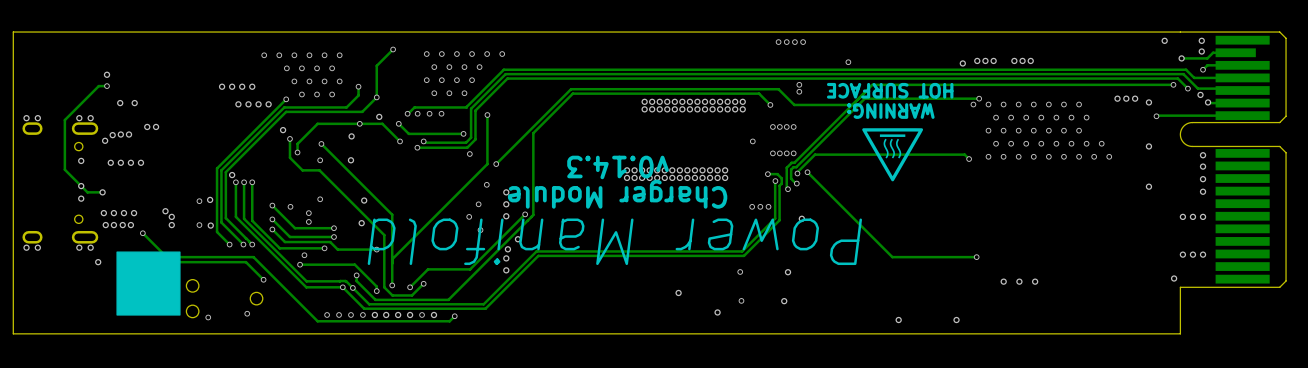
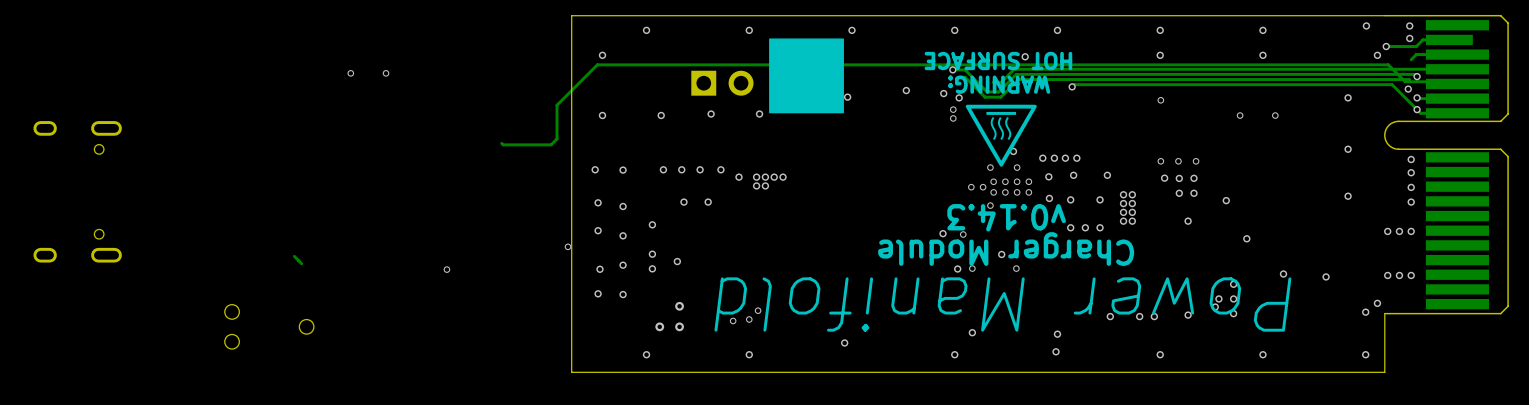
board edge: (483, 32) (13, 32) (13, 333) (1180, 333) -> (571, 15) (571, 372) (1384, 372) (1384, 367)
via: (778, 42) -> none
via: (786, 42) -> none
via: (794, 42) -> none
via: (803, 42) -> none
via: none -> (646, 30)
via: none -> (749, 30)
via: none -> (852, 30)
via: none -> (954, 30)
via: none -> (1057, 30)
via: none -> (1160, 30)
via: none -> (1262, 30)
track: (393, 49) (376, 65) (376, 97) (362, 111) (286, 111) (225, 172) (225, 218) (245, 238) -> none
via: (393, 49) -> none
drawing: none -> [769, 38, 844, 114]
via: (426, 54) -> none
via: (441, 54) -> none
via: (456, 54) -> none
via: (472, 54) -> none
via: (487, 54) -> none
via: (502, 54) -> none
via: (264, 55) -> none
via: (279, 55) -> none
via: (294, 55) -> none
via: (309, 55) -> none
via: (324, 55) -> none
via: (339, 55) -> none
via: (977, 60) -> none
via: (985, 60) -> none
via: (993, 60) -> none
via: (1014, 60) -> none
via: (1022, 60) -> none
via: (1030, 60) -> none
via: (848, 62) -> none
via: (962, 63) -> none
via: none -> (602, 55)
via: none -> (1160, 55)
via: none -> (1262, 55)
via: none -> (1377, 55)
via: (434, 67) -> none
via: (449, 67) -> none
via: (464, 67) -> none
via: (479, 67) -> none
via: none -> (1025, 56)
via: (286, 68) -> none
via: (301, 68) -> none
via: (317, 68) -> none
via: (332, 68) -> none
via: (1203, 69) -> none
via: (107, 74) -> none
track: (1194, 77) (1186, 69) (503, 69) (466, 107) (414, 107) (407, 113) -> (1400, 69) (1014, 69) (1001, 82) (993, 82)
track: none -> (952, 69) (965, 69) (987, 92) (998, 92) (1016, 74) (1414, 74) (1417, 76)
via: none -> (952, 69)
via: (426, 80) -> none
via: (441, 80) -> none
via: (456, 80) -> none
via: (472, 80) -> none
via: (309, 81) -> none
via: (339, 81) -> none
via: (799, 84) -> none
track: none -> (962, 77) (965, 77) (985, 97) (1000, 97) (1018, 79) (1409, 79)
track: (1173, 84) (872, 84) (794, 162) (786, 167) (788, 189) -> none
via: (1173, 84) -> none
via: none -> (1417, 76)
track: (107, 86) (98, 86) (64, 120) (64, 169) (87, 192) (102, 192) -> none
via: (107, 86) -> none
via: (222, 86) -> none
via: (232, 86) -> none
via: (242, 86) -> none
via: (252, 86) -> none
track: (358, 86) (358, 95) (346, 107) (284, 107) (221, 170) (221, 222) (243, 244) -> none
via: (358, 86) -> none
track: (1187, 88) (1177, 78) (507, 78) (475, 110) (475, 139) (467, 147) (417, 147) -> none
via: (1187, 88) -> none
part: none -> (722, 83)
text position: HOT SURFACE (890, 90) -> HOT SURFACE (998, 61)
via: (799, 91) -> none
via: (434, 93) -> none
via: (449, 93) -> none
via: (464, 93) -> none
via: none -> (1072, 86)
via: (301, 94) -> none
via: (317, 94) -> none
via: (332, 94) -> none
via: none -> (906, 90)
via: (376, 97) -> none
via: none -> (943, 93)
track: (979, 98) (864, 98) (796, 167) (791, 169) (791, 178) (796, 183) -> none
via: (979, 98) -> none
via: (1117, 98) -> none
via: (1126, 98) -> none
via: (1135, 98) -> none
track: (286, 99) (217, 168) (217, 231) (229, 244) -> none
via: (286, 99) -> none
via: (644, 101) -> none
via: (652, 101) -> none
via: (659, 101) -> none
via: (667, 101) -> none
via: (674, 101) -> none
via: (682, 101) -> none
via: (689, 101) -> none
via: (697, 101) -> none
via: (705, 101) -> none
via: (712, 101) -> none
via: (727, 101) -> none
via: (735, 101) -> none
via: (742, 101) -> none
via: none -> (959, 97)
via: (120, 103) -> none
via: (134, 103) -> none
via: (238, 104) -> none
via: (248, 104) -> none
via: (258, 104) -> none
via: (268, 104) -> none
track: (770, 104) (759, 93) (572, 93) (533, 133) (533, 215) (531, 216) -> none
via: (770, 104) -> none
track: (852, 104) (794, 104) (778, 89) (571, 89) (496, 164) -> none
via: (973, 104) -> none
via: (1003, 104) -> none
via: (1018, 104) -> none
via: (1033, 104) -> none
via: (1048, 104) -> none
via: (1063, 104) -> none
via: (1079, 104) -> none
via: (644, 109) -> none
via: (652, 109) -> none
via: (659, 109) -> none
via: (667, 109) -> none
via: (674, 109) -> none
via: (689, 109) -> none
via: (697, 109) -> none
via: (705, 109) -> none
via: (712, 109) -> none
via: (720, 109) -> none
via: (727, 109) -> none
via: (735, 109) -> none
via: (742, 109) -> none
text position: WARNING: (890, 111) -> WARNING: (999, 84)
via: none -> (953, 109)
via: none -> (1417, 109)
via: (407, 113) -> none
via: (417, 113) -> none
via: (429, 113) -> none
via: (441, 113) -> none
track: (487, 115) (487, 164) (392, 259) -> none
via: (487, 115) -> none
track: (1211, 115) (1156, 116) -> (1420, 113) (1392, 84) (1074, 84) (1072, 86)
via: (379, 116) -> none
via: none -> (711, 114)
via: none -> (759, 114)
via: (1156, 116) -> none
via: none -> (602, 115)
via: none -> (661, 115)
via: (996, 117) -> none
via: (1011, 117) -> none
via: (1026, 117) -> none
via: (1041, 117) -> none
via: (1071, 117) -> none
via: (26, 118) -> none
via: (37, 118) -> none
via: (79, 118) -> none
via: (90, 118) -> none
via: none -> (953, 118)
via: (359, 123) -> none
track: (398, 123) (408, 133) (463, 133) -> none
via: (398, 123) -> none
via: (147, 126) -> none
via: (156, 126) -> none
via: (772, 126) -> none
via: (779, 126) -> none
via: (786, 126) -> none
via: (793, 126) -> none
via: (283, 130) -> none
via: (988, 130) -> none
via: (1003, 130) -> none
via: (1018, 130) -> none
via: (1033, 130) -> none
via: (1048, 130) -> none
via: (1063, 130) -> none
via: (1079, 130) -> none
via: (463, 133) -> none
via: (120, 134) -> none
via: (129, 134) -> none
via: (112, 135) -> none
via: (351, 136) -> none
track: (289, 138) (289, 157) (302, 170) (319, 170) (384, 235) (384, 287) (392, 295) (411, 295) (423, 283) -> none
via: (289, 138) -> none
via: (105, 140) -> none
track: (400, 141) (382, 123) (317, 123) (297, 143) (297, 152) -> none
via: (400, 141) -> none
via: (423, 141) -> none
via: (752, 141) -> none
track: (321, 143) (392, 214) (392, 285) -> none
via: (321, 143) -> none
via: (996, 143) -> none
via: (1011, 143) -> none
via: (1026, 143) -> none
via: (1041, 143) -> none
via: (1056, 143) -> none
via: (1071, 143) -> none
via: (1086, 143) -> none
via: (1101, 143) -> none
via: (417, 147) -> none
via: none -> (1013, 151)
via: (297, 152) -> none
via: (772, 153) -> none
via: (779, 153) -> none
via: (786, 153) -> none
via: (793, 153) -> none
via: (469, 154) -> none
via: none -> (1042, 158)
drawing position: (892, 154) -> (1001, 135)
via: none -> (1054, 158)
via: none -> (1065, 158)
via: none -> (1076, 158)
via: (1033, 156) -> none
via: (1048, 156) -> none
via: (1063, 156) -> none
via: (1079, 156) -> none
via: (1094, 156) -> none
via: (1109, 156) -> none
track: (969, 159) (964, 154) (815, 154) (797, 173) -> none
via: (969, 159) -> none
via: (81, 160) -> none
via: (320, 160) -> none
via: (350, 160) -> none
via: (110, 162) -> none
via: (120, 162) -> none
via: (130, 162) -> none
via: (140, 162) -> none
via: none -> (990, 167)
via: none -> (1017, 167)
via: (496, 164) -> none
via: none -> (595, 169)
via: none -> (623, 170)
via: none -> (663, 169)
via: none -> (681, 169)
via: none -> (700, 169)
via: none -> (720, 169)
text position: v0.14.3 (618, 167) -> v0.14.3 (1006, 217)
via: none -> (1073, 175)
via: none -> (1107, 175)
via: (634, 170) -> none
via: (672, 170) -> none
via: (679, 170) -> none
via: (687, 170) -> none
via: (694, 170) -> none
via: (702, 170) -> none
via: (710, 170) -> none
via: (717, 170) -> none
via: (725, 170) -> none
via: none -> (1048, 176)
via: none -> (1164, 178)
via: none -> (1179, 178)
via: none -> (1193, 178)
track: (807, 172) (892, 257) (976, 257) -> none
via: (807, 172) -> none
via: (797, 173) -> none
track: (767, 174) (777, 174) (781, 178) (779, 185) (779, 220) (743, 255) (538, 255) (485, 308) (364, 308) (342, 287) (306, 287) (235, 216) (235, 182) -> none
via: (767, 174) -> none
via: none -> (993, 181)
via: none -> (1005, 181)
via: none -> (1017, 181)
via: none -> (1028, 181)
via: (232, 175) -> none
via: (627, 177) -> none
via: (634, 177) -> none
via: (657, 177) -> none
via: (664, 177) -> none
via: (672, 177) -> none
via: (679, 177) -> none
via: (687, 177) -> none
via: (694, 177) -> none
via: (702, 177) -> none
via: (710, 177) -> none
via: (717, 177) -> none
via: (725, 177) -> none
via: none -> (971, 187)
via: none -> (983, 187)
track: (775, 181) (775, 218) (742, 251) (536, 251) (483, 304) (369, 304) (345, 281) (306, 281) (244, 218) (244, 182) -> none
via: (775, 181) -> none
via: (235, 182) -> none
via: (244, 182) -> none
track: (252, 182) (252, 220) (279, 248) (324, 248) -> none
via: (252, 182) -> none
via: (796, 183) -> none
via: none -> (993, 192)
via: none -> (1005, 192)
via: none -> (1017, 192)
via: none -> (1028, 192)
via: (486, 184) -> none
via: none -> (1179, 193)
via: none -> (1193, 193)
via: none -> (1123, 194)
via: none -> (1132, 194)
via: (81, 186) -> none
via: none -> (1049, 198)
via: (788, 189) -> none
via: none -> (1070, 199)
via: none -> (1100, 199)
via: none -> (1226, 200)
via: none -> (683, 202)
via: none -> (708, 202)
via: (102, 192) -> none
via: none -> (1123, 203)
via: none -> (1132, 203)
text position: Charger Module (617, 194) -> Charger Module (1006, 249)
via: none -> (990, 205)
via: none -> (623, 206)
via: (81, 198) -> none
via: (210, 199) -> none
via: (320, 199) -> none
via: (364, 200) -> none
via: none -> (1123, 212)
via: none -> (1132, 212)
via: (199, 201) -> none
via: (478, 204) -> none
via: (506, 204) -> none
track: (272, 205) (295, 228) (334, 228) -> none
via: (272, 205) -> none
via: (290, 206) -> none
via: (752, 206) -> none
via: (760, 206) -> none
via: (768, 206) -> none
via: none -> (1123, 221)
via: none -> (1132, 221)
via: none -> (1188, 221)
via: (165, 211) -> none
via: none -> (652, 224)
via: (103, 213) -> none
via: (113, 213) -> none
via: (123, 213) -> none
via: (134, 213) -> none
via: (308, 213) -> none
via: none -> (1070, 227)
via: none -> (1085, 227)
via: none -> (1100, 227)
track: (525, 214) (470, 269) (428, 269) (410, 287) -> none
via: (525, 214) -> none
via: (171, 216) -> none
via: (469, 216) -> none
track: (531, 216) (527, 220) -> none
track: (272, 219) (289, 237) (334, 237) -> none
via: (272, 219) -> none
via: none -> (963, 234)
track: (527, 220) (448, 299) (375, 299) (356, 281) (356, 275) -> none
via: none -> (623, 235)
via: (308, 221) -> none
via: (361, 223) -> none
via: none -> (1246, 238)
via: (105, 225) -> none
via: (113, 225) -> none
via: (122, 225) -> none
via: (130, 225) -> none
via: (171, 225) -> none
via: (199, 225) -> none
via: (210, 225) -> none
via: (334, 228) -> none
track: (272, 229) (284, 242) (330, 242) (337, 249) (376, 249) -> none
via: (272, 229) -> none
track: (142, 233) (166, 257) (253, 257) (317, 321) (449, 321) (454, 316) -> none
via: (142, 233) -> none
via: none -> (652, 254)
via: none -> (1001, 254)
via: (334, 237) -> none
via: (517, 239) -> none
text position: Power Manifold (614, 241) -> Power Manifold (1002, 304)
via: none -> (677, 261)
via: (229, 244) -> none
via: (243, 244) -> none
via: (252, 244) -> none
via: none -> (623, 265)
via: (26, 247) -> none
via: (37, 247) -> none
via: (79, 247) -> none
via: (90, 247) -> none
via: (324, 248) -> none
via: none -> (652, 268)
via: none -> (972, 268)
via: none -> (1016, 268)
via: none -> (957, 269)
drawing: [116, 251, 181, 316] -> none
via: none -> (1283, 274)
via: (304, 255) -> none
via: none -> (1326, 276)
via: (976, 257) -> none
via: (506, 258) -> none
via: (98, 262) -> none
track: (137, 262) (245, 262) (263, 279) -> none
via: none -> (1233, 284)
track: (300, 264) (354, 264) (376, 286) (376, 291) -> none
via: (300, 264) -> none
via: none -> (623, 294)
via: (740, 271) -> none
via: (788, 272) -> none
via: none -> (1218, 298)
via: none -> (1233, 298)
via: (356, 275) -> none
via: (263, 279) -> none
via: none -> (679, 306)
via: (1003, 281) -> none
via: (1019, 281) -> none
via: (423, 283) -> none
via: none -> (758, 310)
via: (392, 285) -> none
via: none -> (1365, 312)
via: (342, 287) -> none
via: (352, 287) -> none
via: (410, 287) -> none
via: none -> (1233, 313)
via: none -> (1188, 315)
via: none -> (1110, 316)
via: none -> (1139, 316)
via: none -> (1154, 316)
via: (376, 291) -> none
via: none -> (749, 319)
via position: (678, 292) -> (749, 354)
via: none -> (733, 320)
via: none -> (659, 326)
via: none -> (679, 326)
via: (741, 300) -> none
via: (784, 301) -> none
via: none -> (972, 332)
via: none -> (1057, 334)
via: (247, 313) -> none
via: (327, 314) -> none
via: (339, 314) -> none
via: (350, 314) -> none
via: (362, 314) -> none
via: (374, 314) -> none
via: (386, 314) -> none
via: (398, 314) -> none
via: (410, 314) -> none
via: (422, 314) -> none
via: (433, 314) -> none
via: (454, 316) -> none
via: (208, 317) -> none
via: (956, 320) -> none
via: none -> (646, 354)
via: none -> (954, 354)
via: none -> (1160, 354)
via: none -> (1262, 354)
via: none -> (1365, 354)

